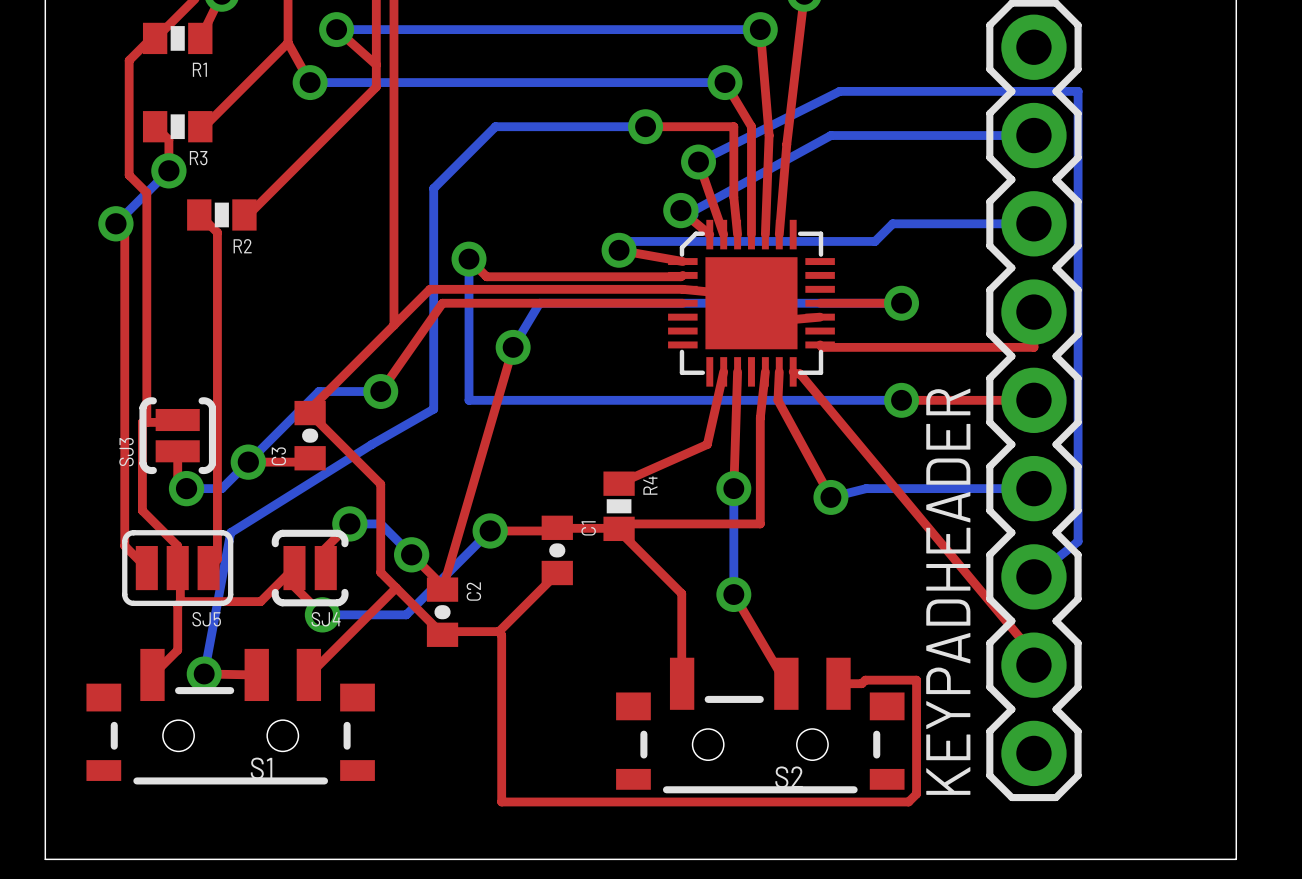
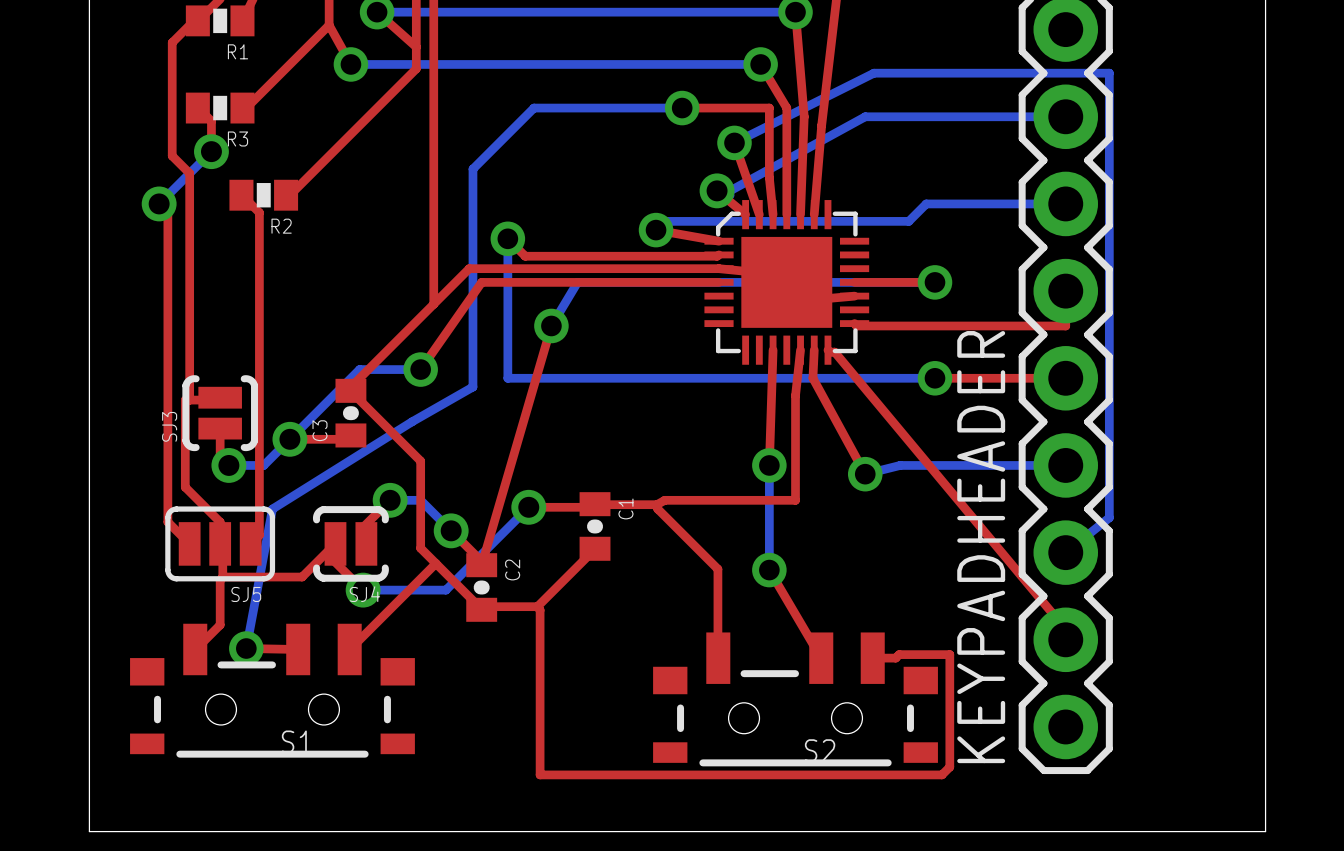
top track: (723, 371) (707, 444) (619, 483) -> none
R4: (619, 506) -> none

